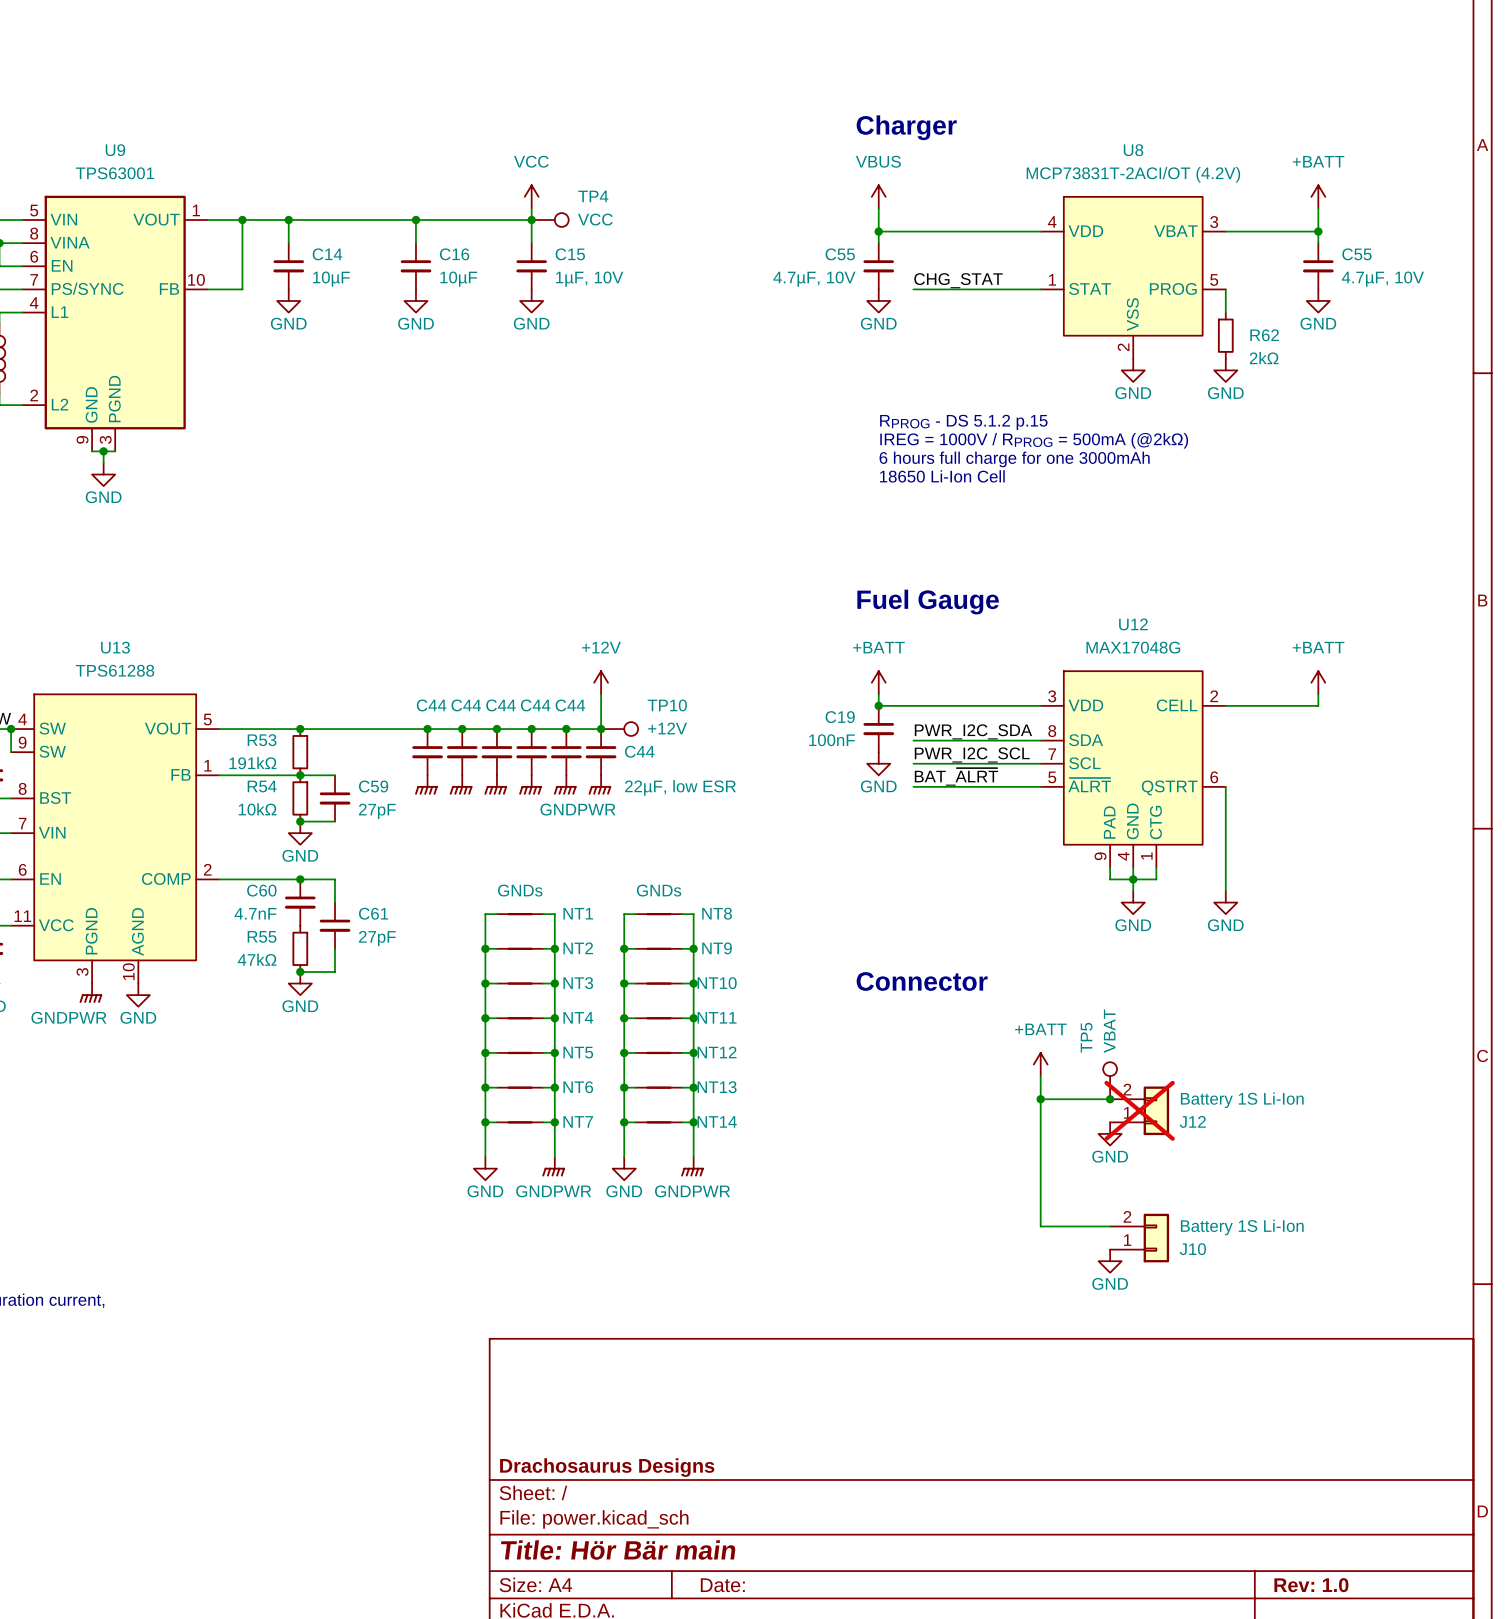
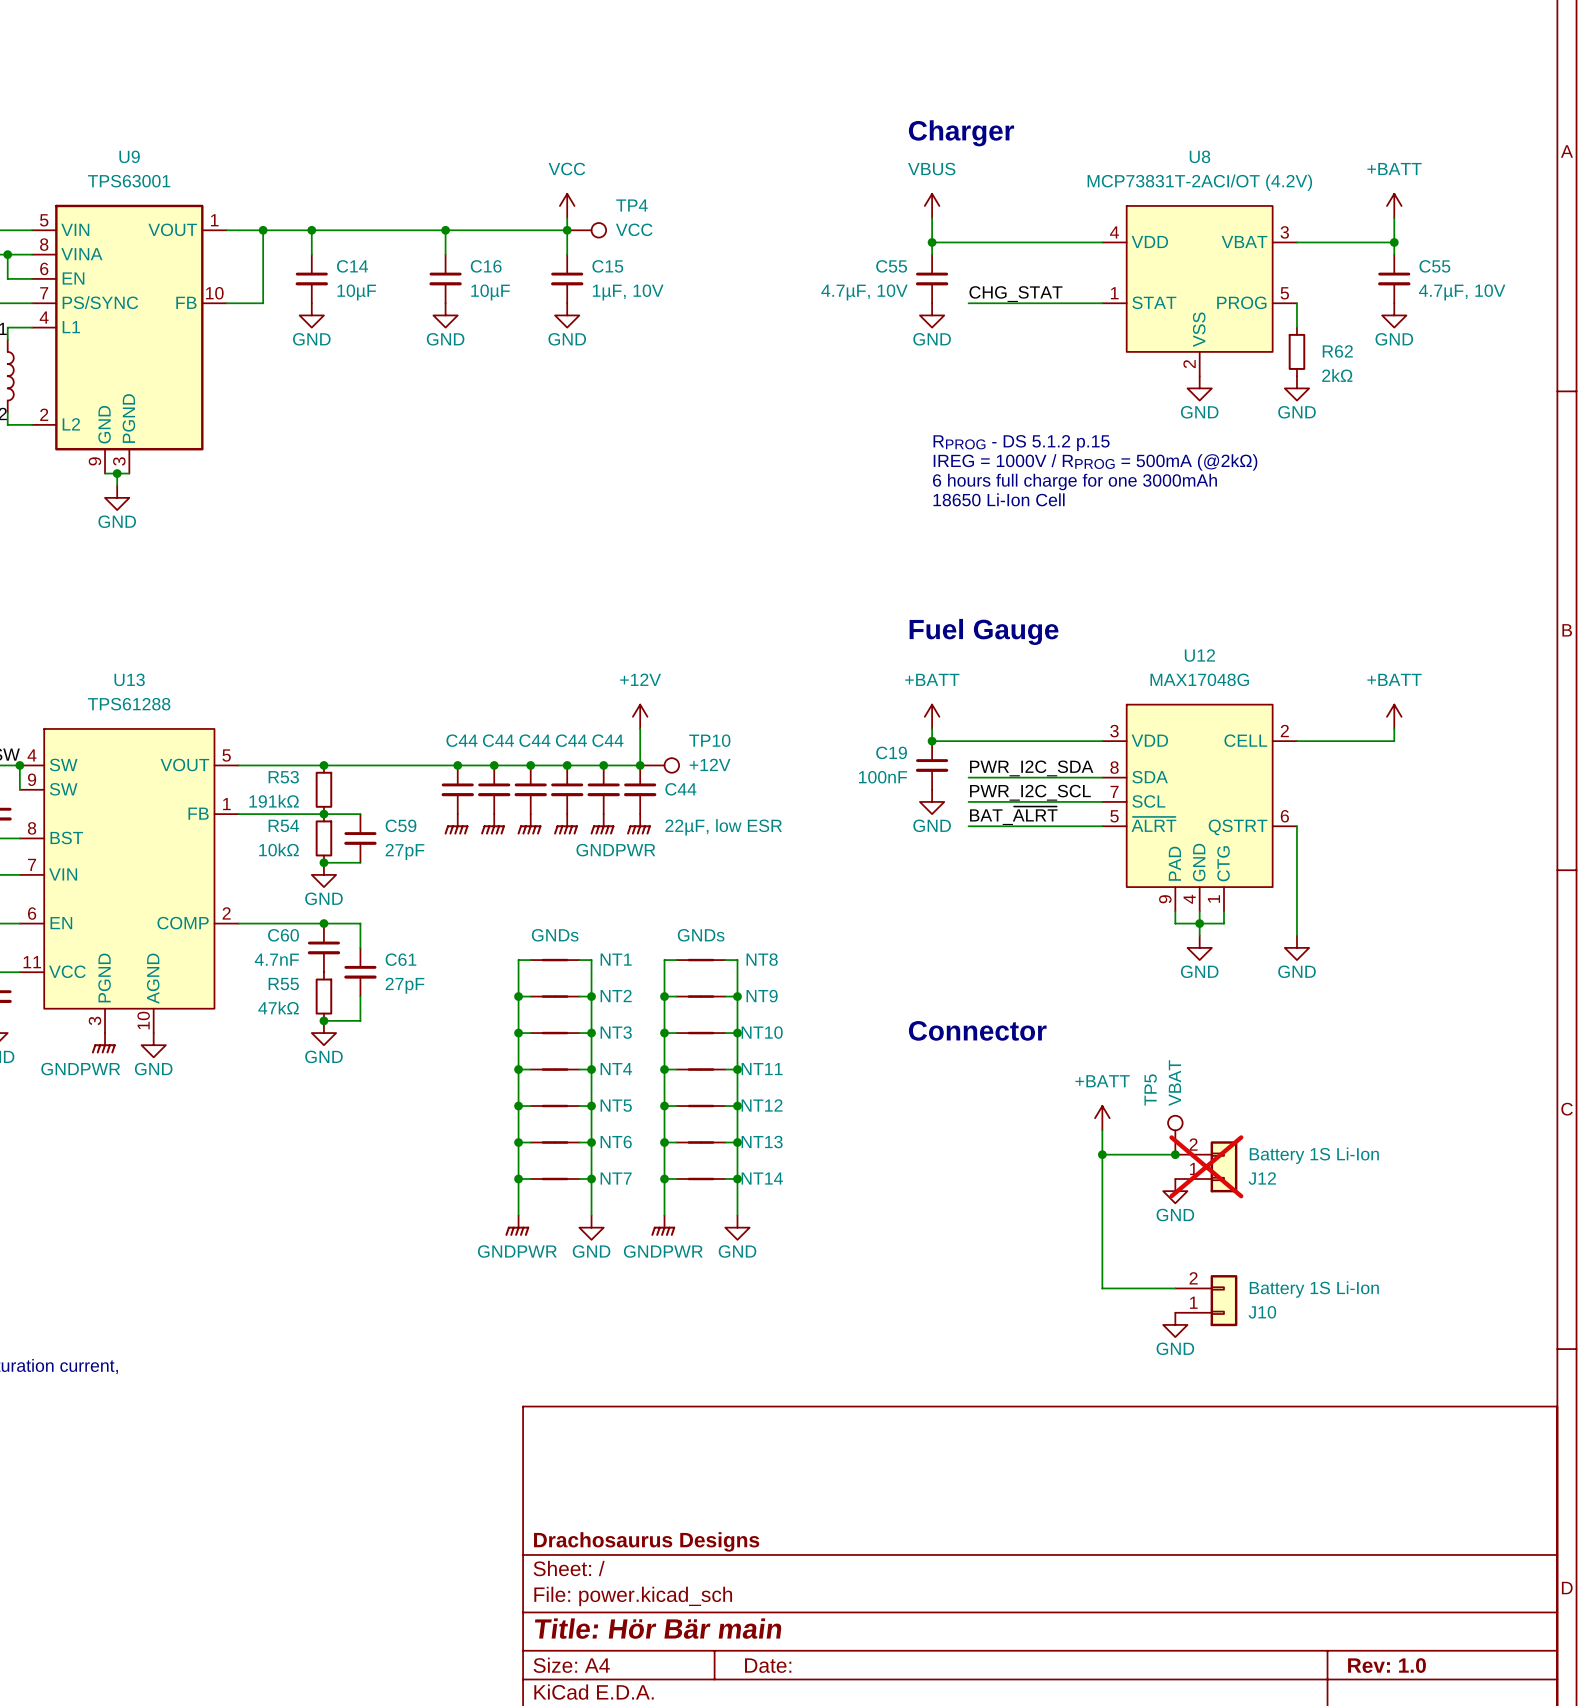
power symbol: GNDPWR (553, 1166) -> GND (591, 1227)
power symbol: GNDPWR (692, 1166) -> GND (737, 1227)
power symbol: GND (485, 1168) -> GNDPWR (517, 1225)
power symbol: GND (624, 1168) -> GNDPWR (663, 1225)

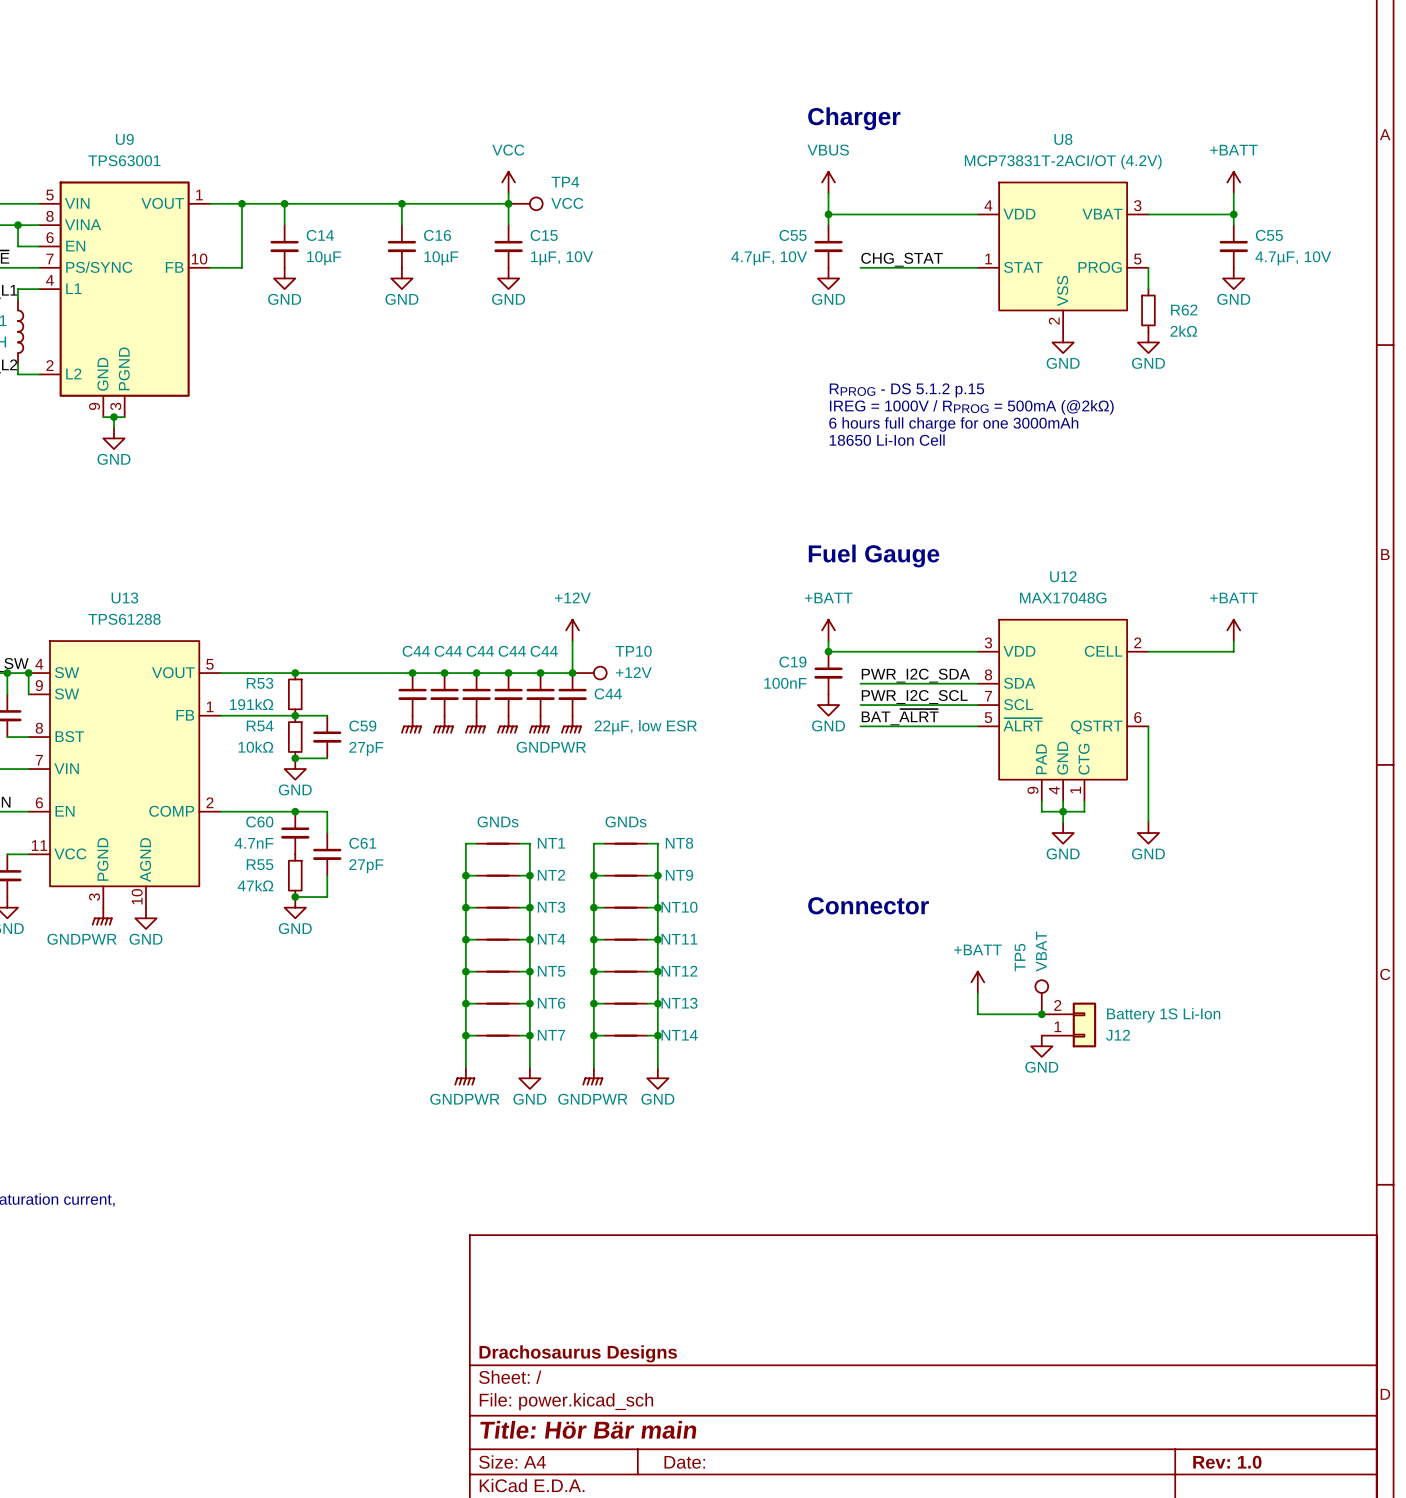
wire: (1102, 1154) (1102, 1288) (1175, 1288) -> none
junction: (1102, 1154) -> none
J12 do-not-place cross: (1206, 1166) -> none
J10: Battery 1S Li-Ion (1206, 1300) -> none
power symbol: GND (1175, 1324) -> none

